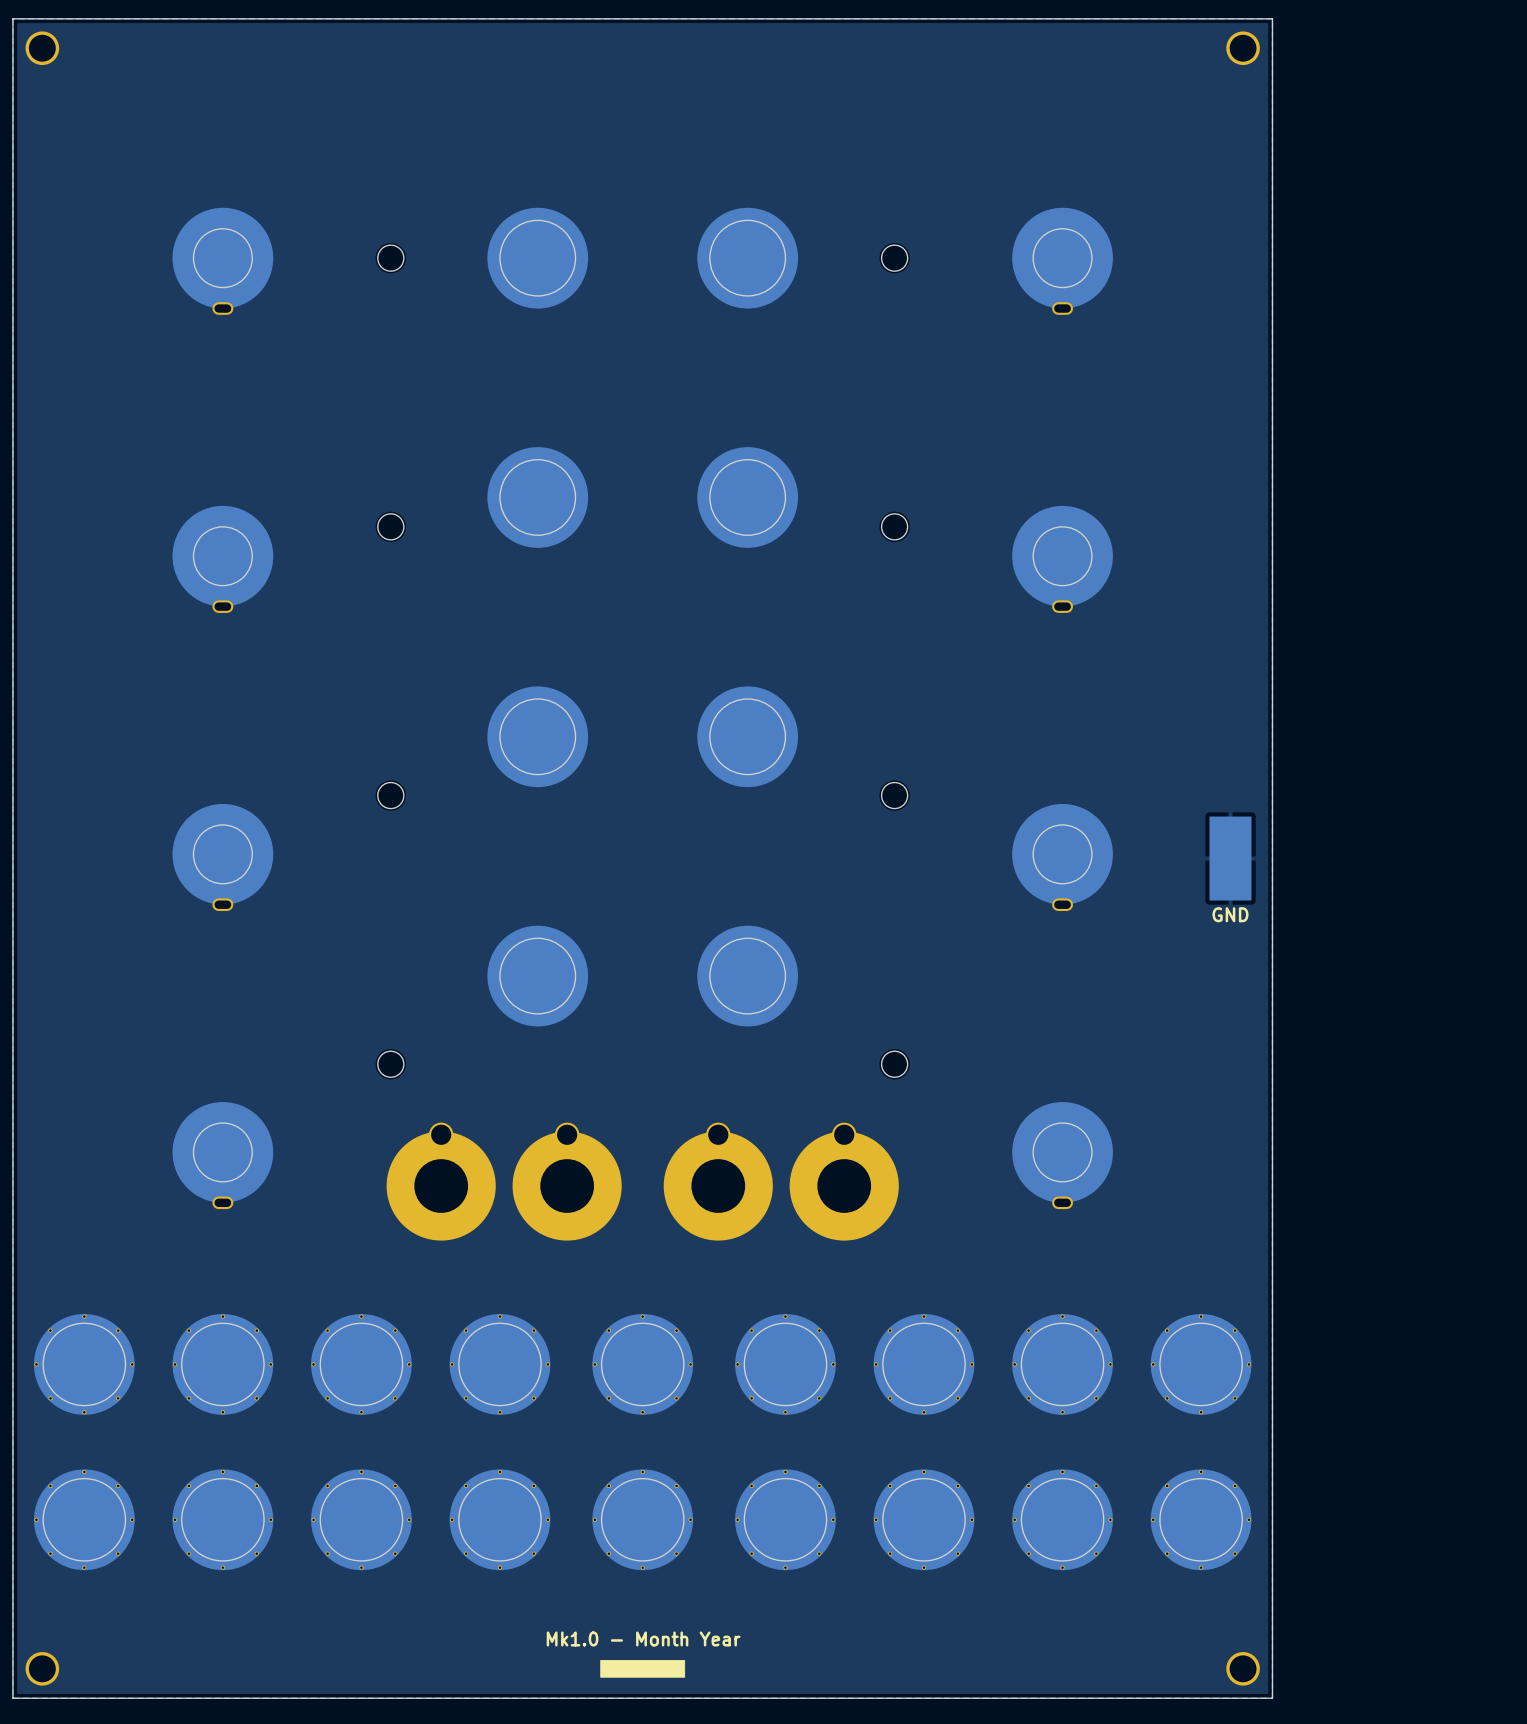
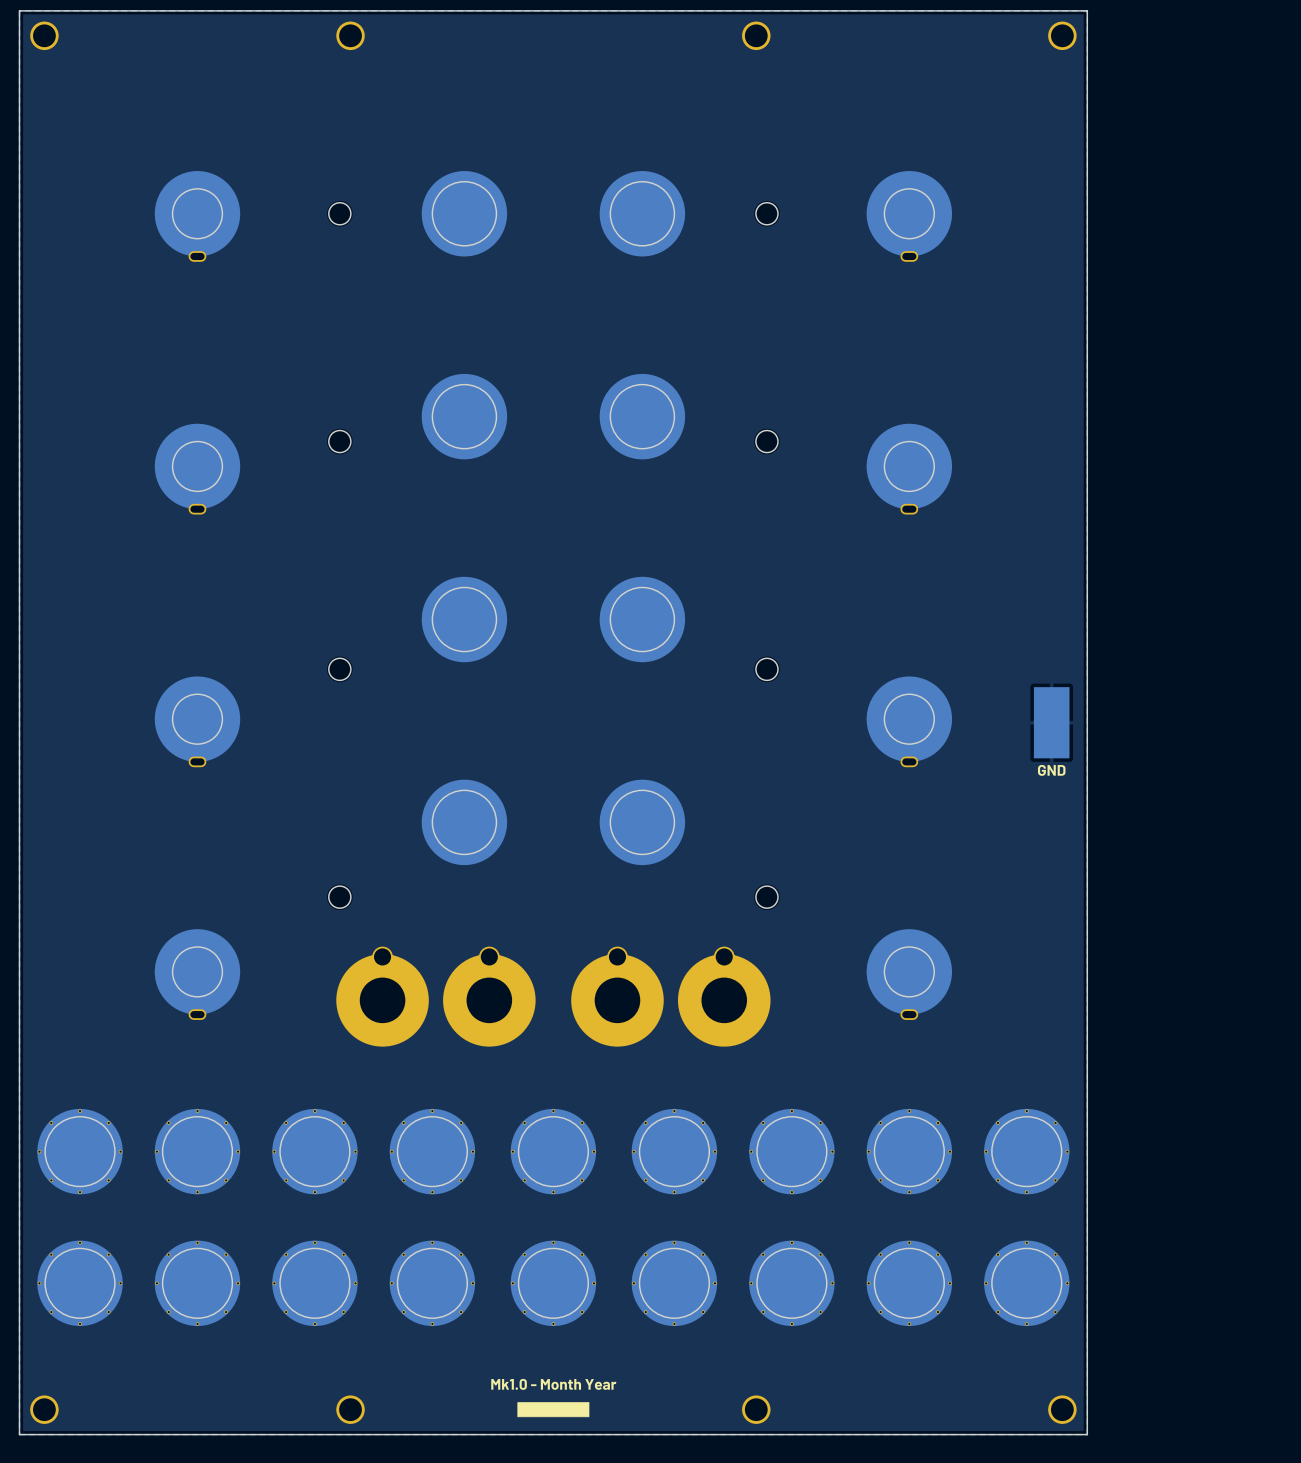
part: none -> (350, 35)
part: none -> (756, 35)
part: none -> (350, 1409)
part: none -> (756, 1409)

